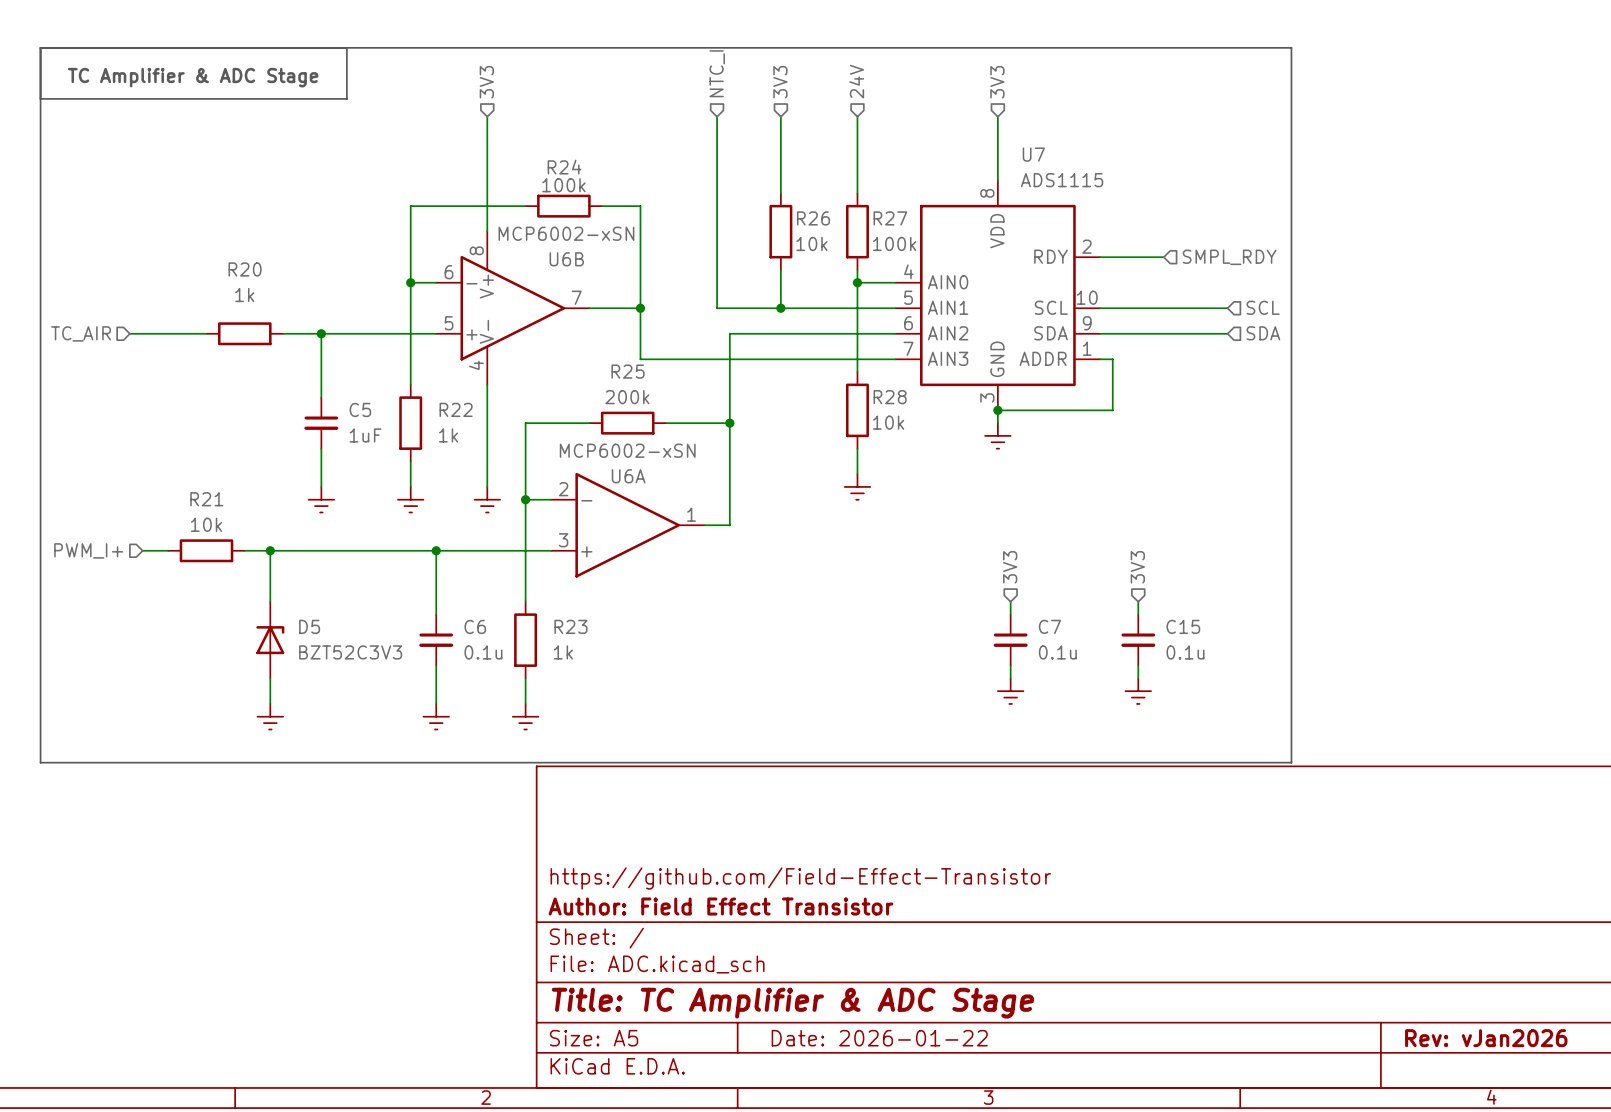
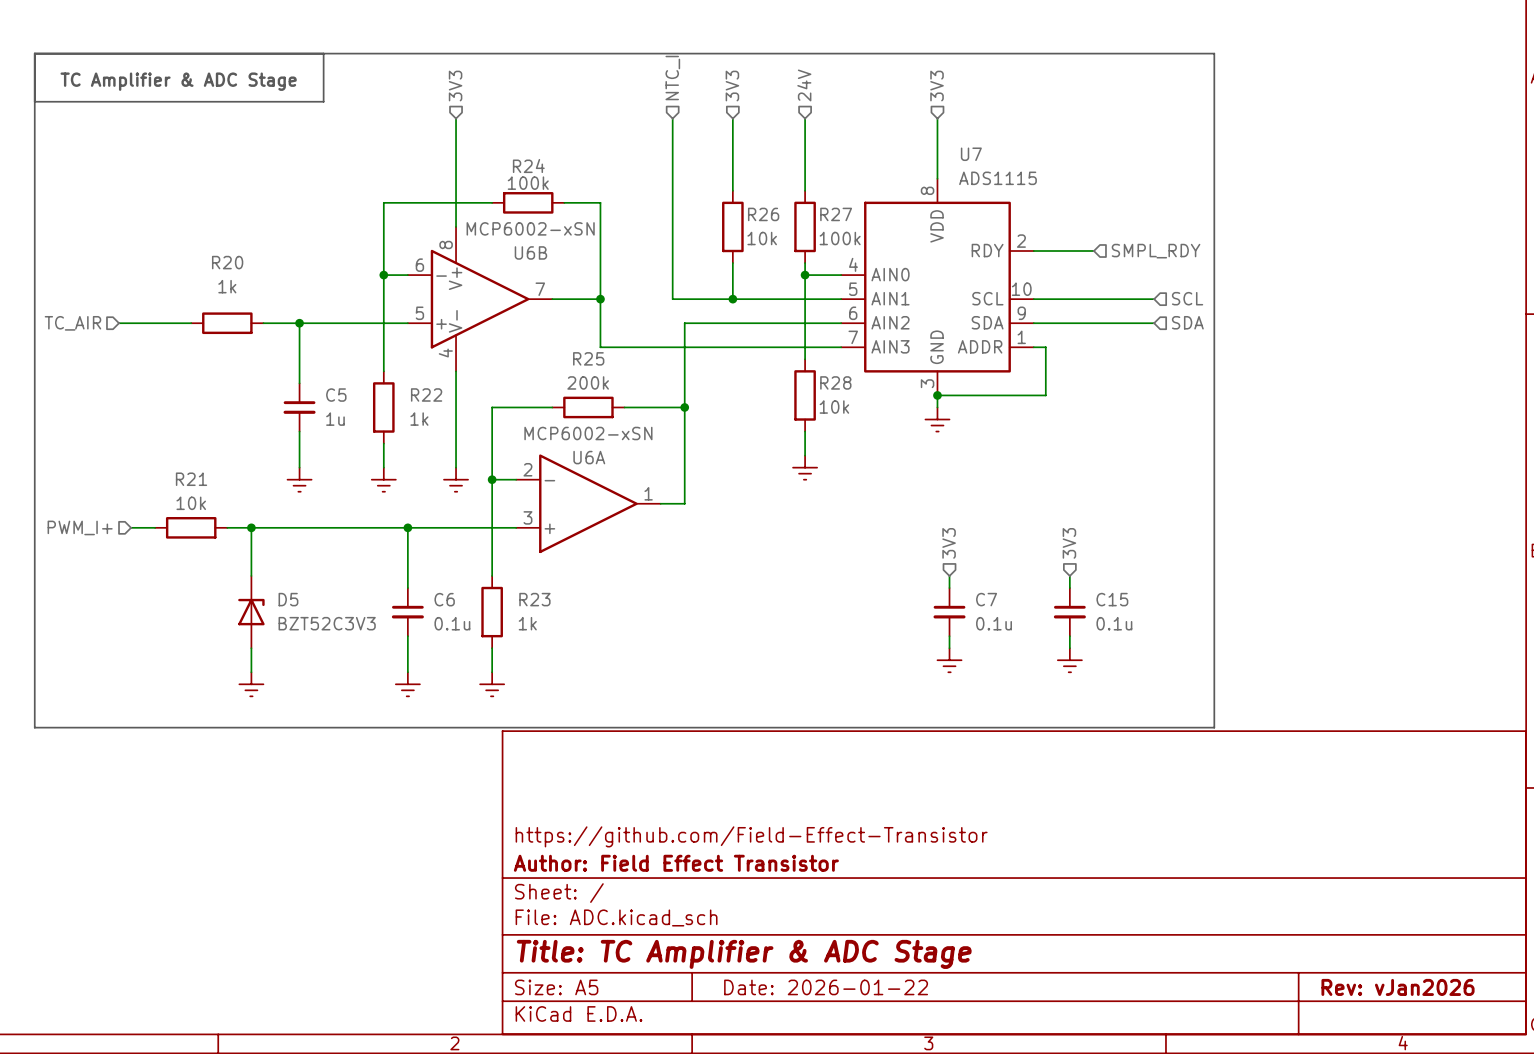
C5 value: 1uF (365, 435) -> 1u (335, 419)

